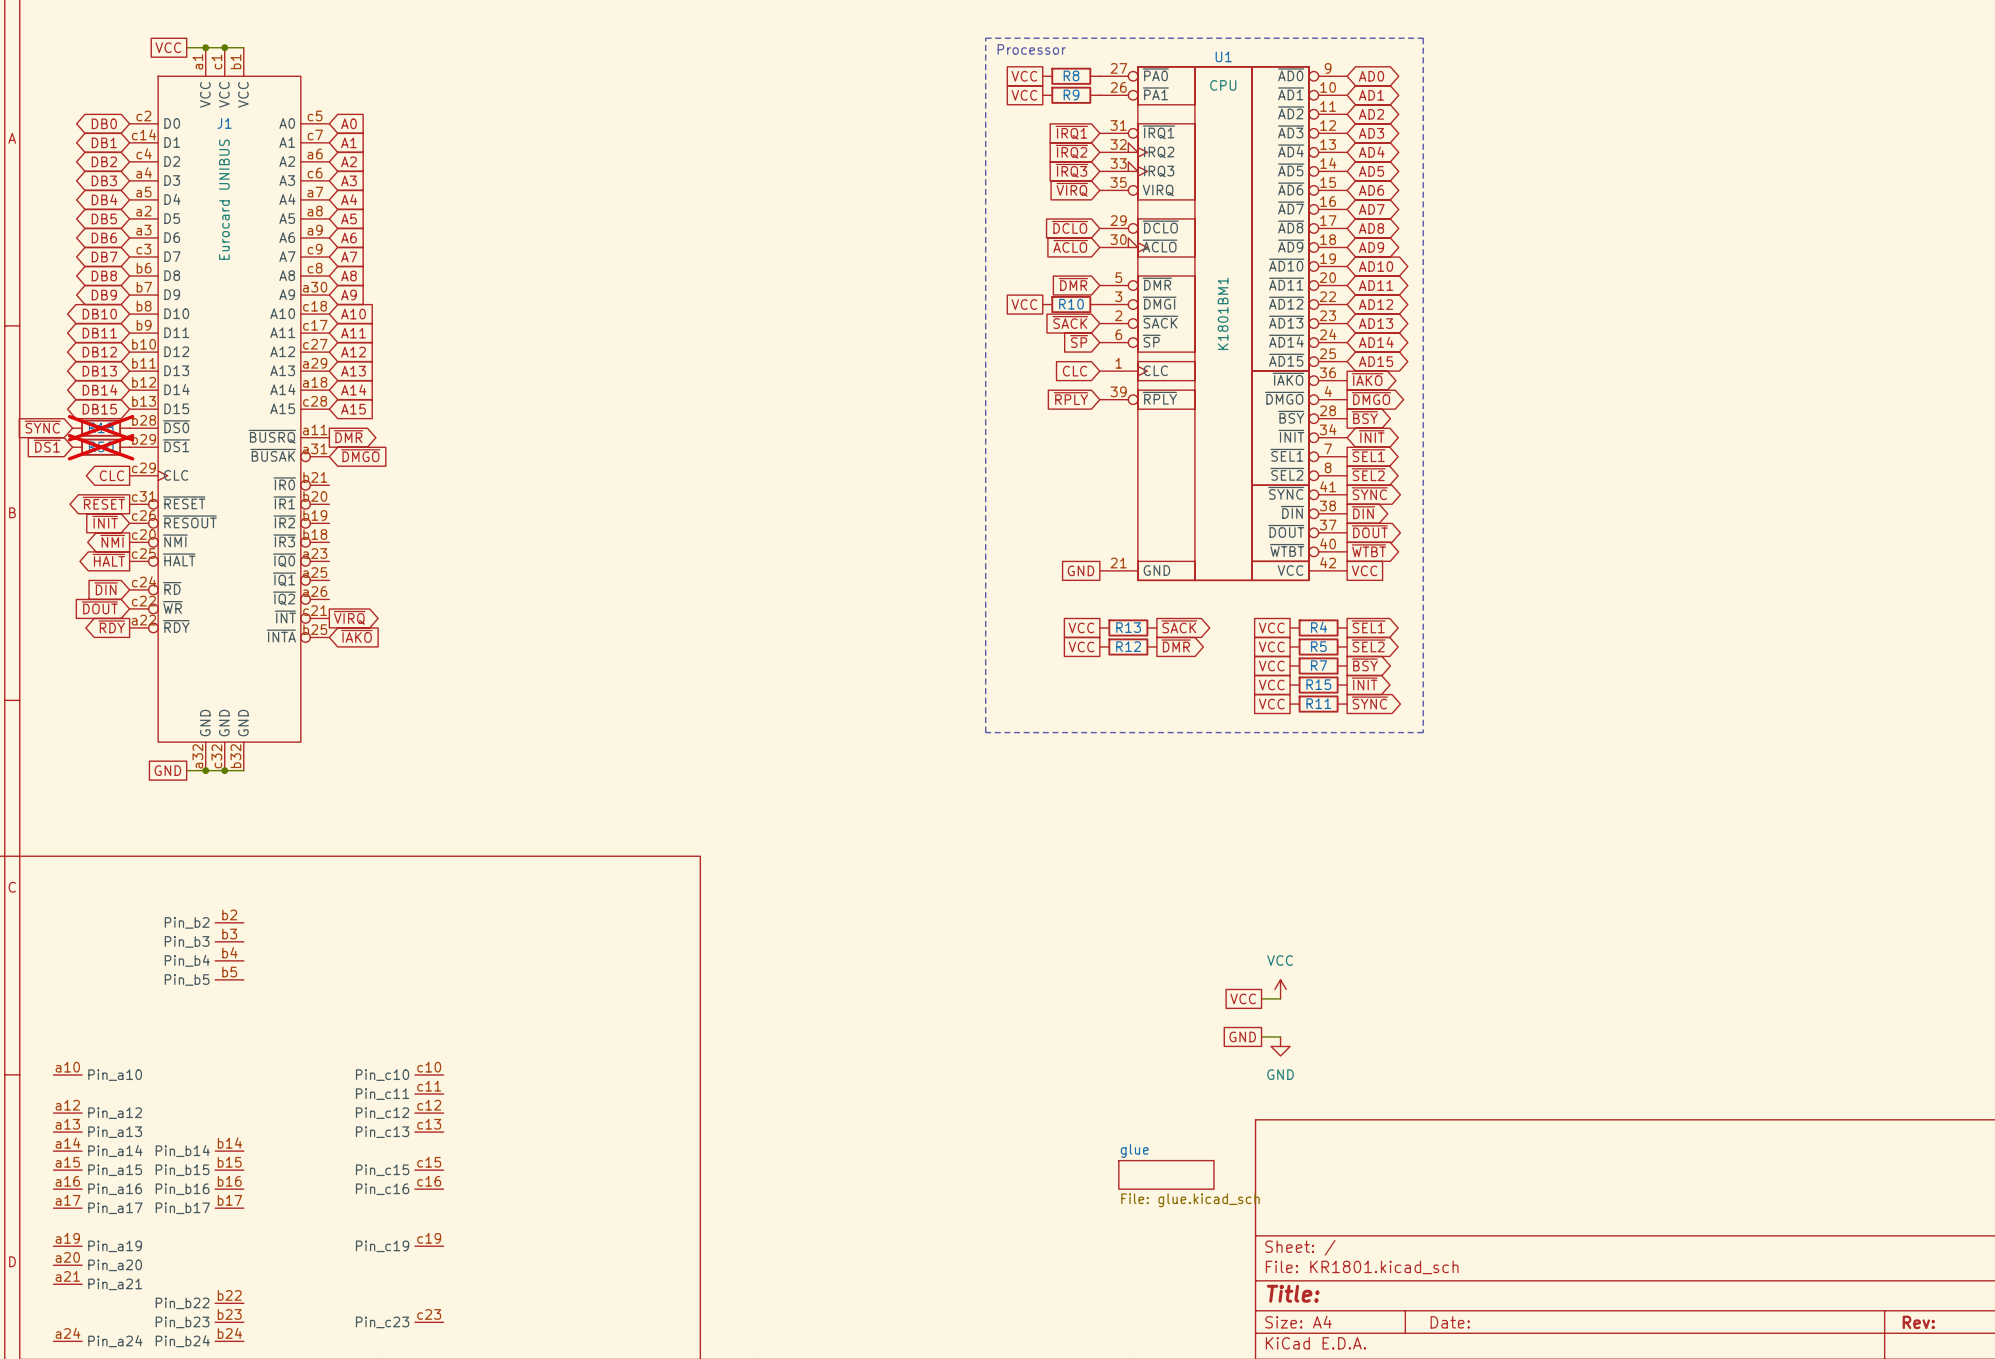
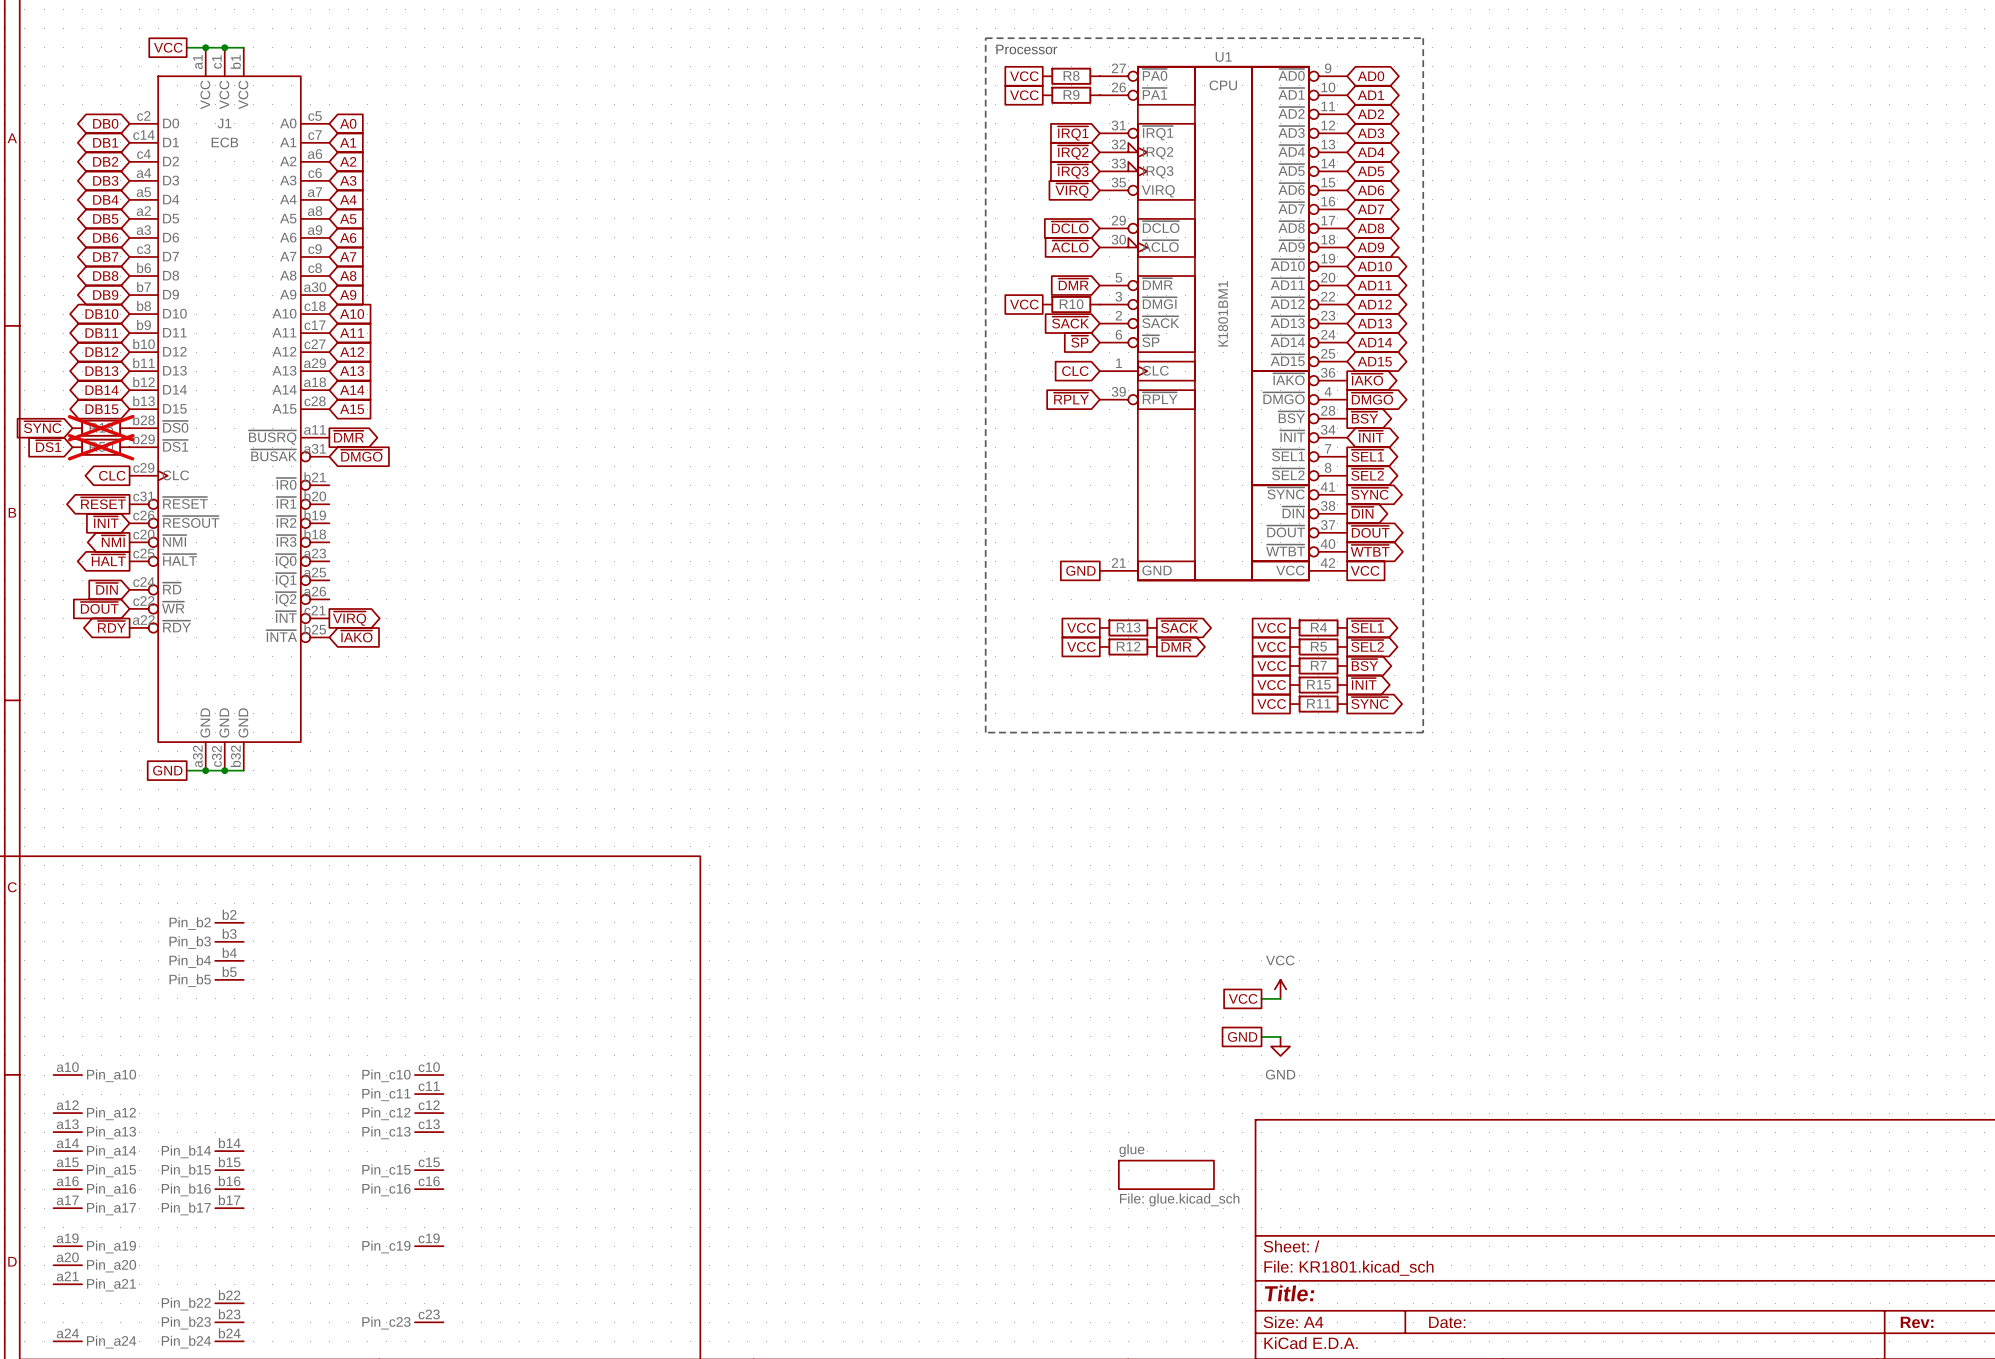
J1 value: Eurocard UNIBUS (224, 199) -> ECB (224, 142)

